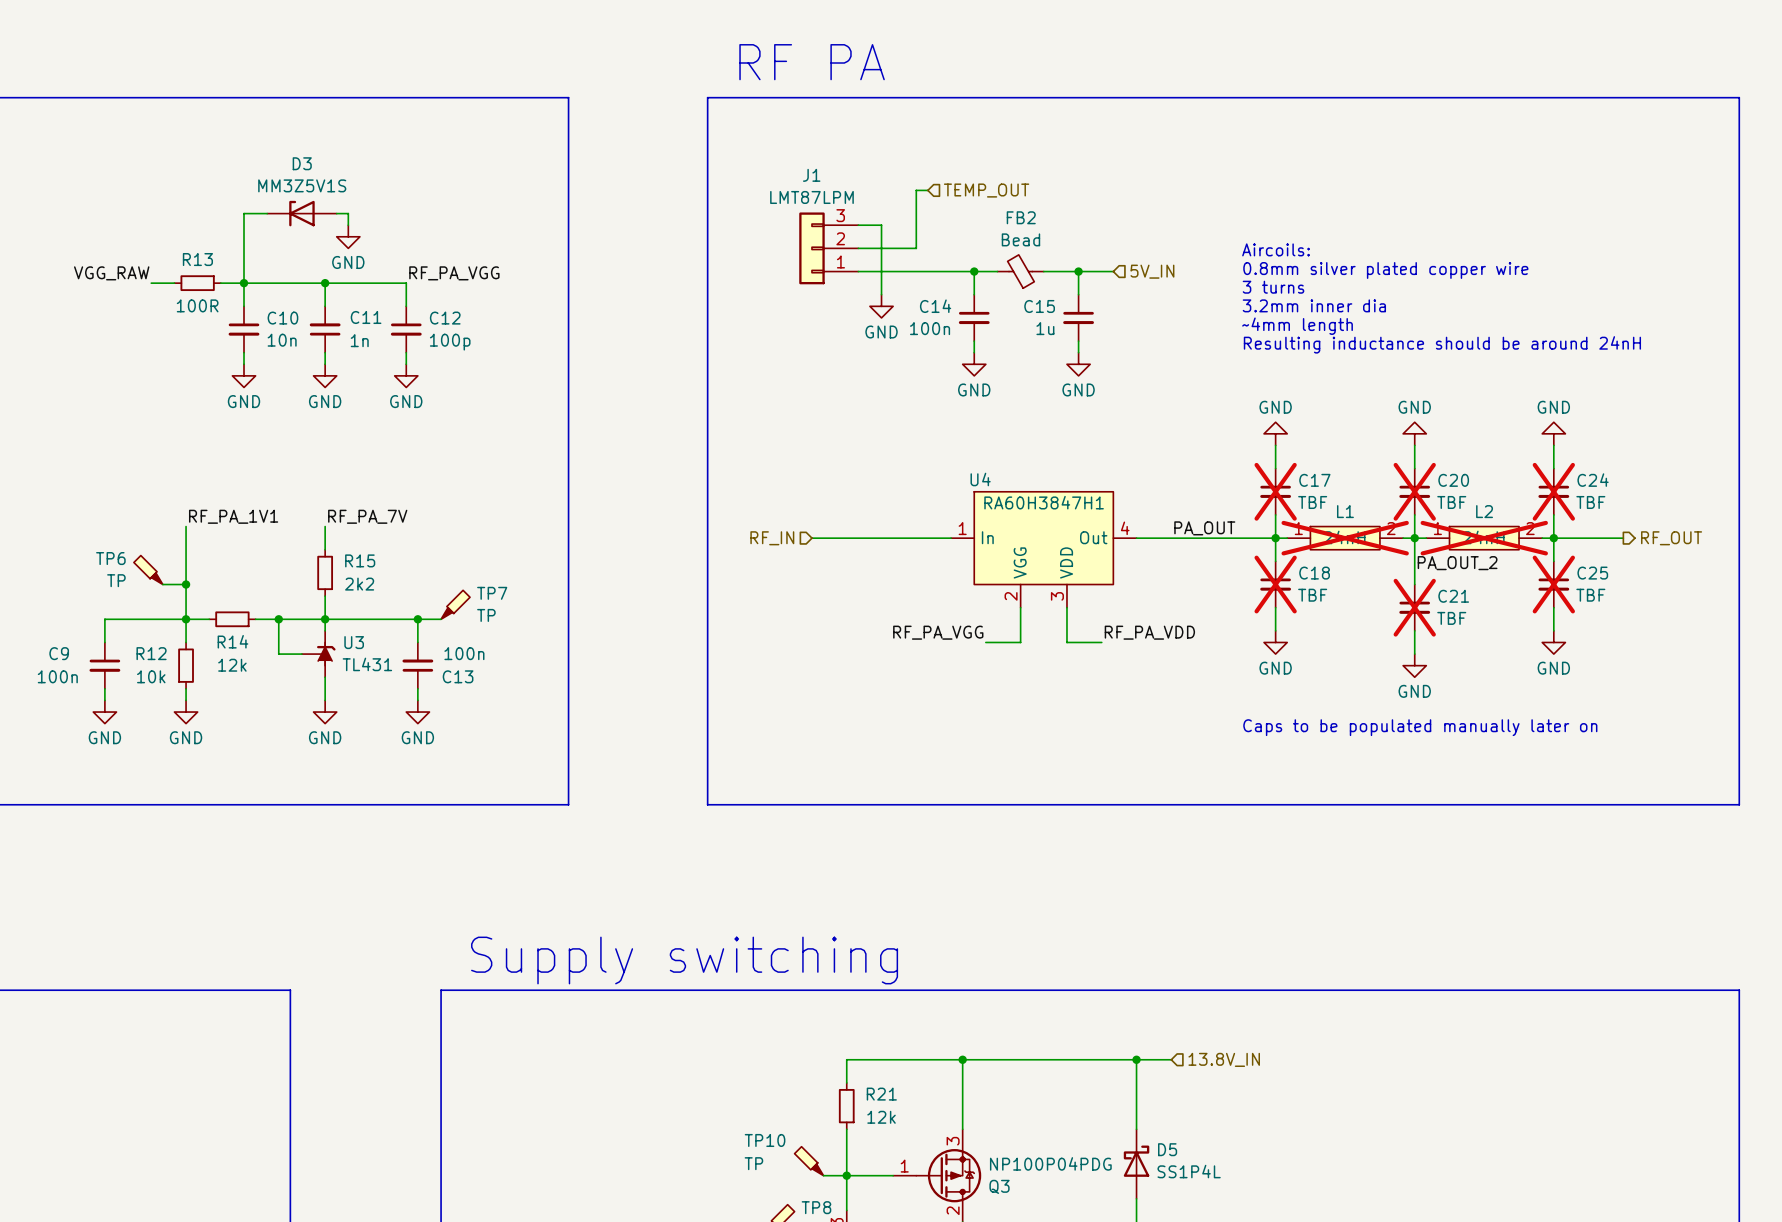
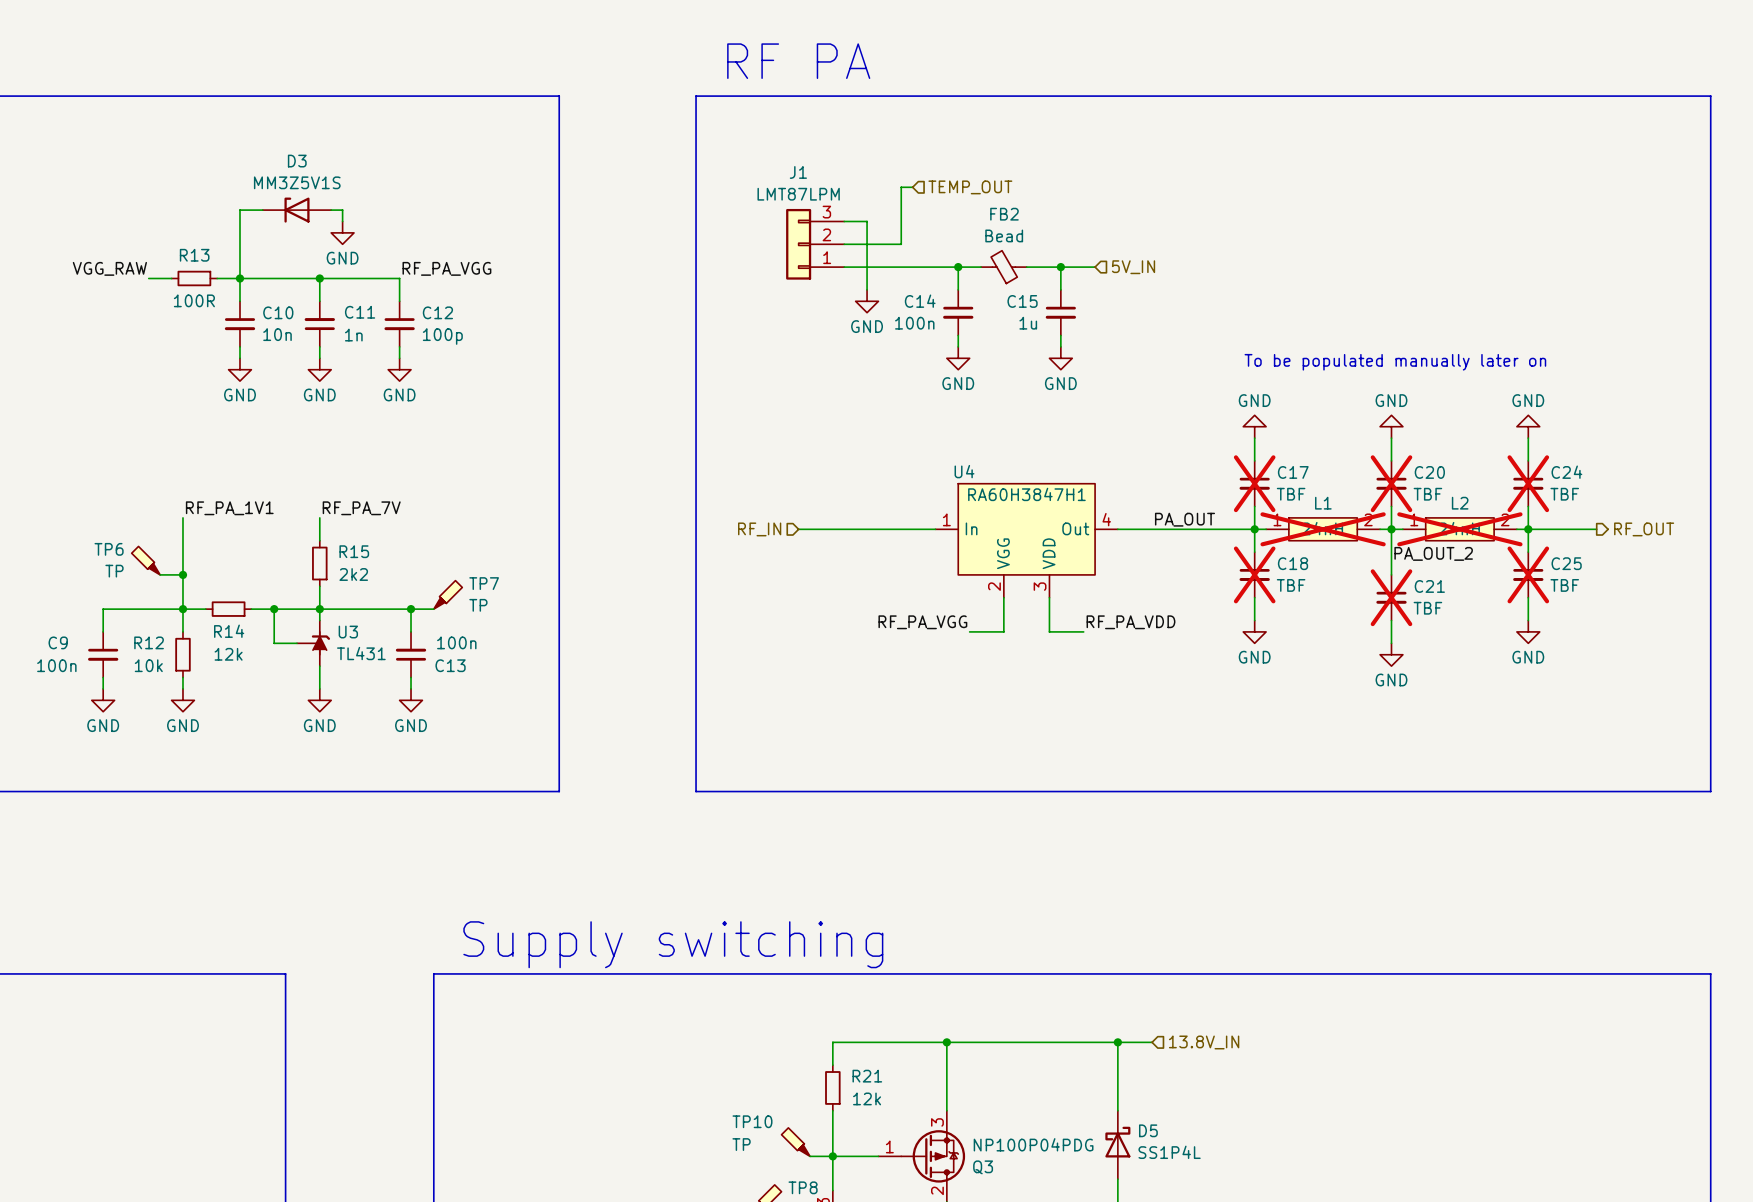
text: Aircoils: (1275, 249) -> none
text: 0.8mm silver plated copper wire (1385, 270) -> none
text: 3 turns (1273, 287) -> none
text: 3.2mm inner dia (1314, 305) -> none
text: ~4mm length (1297, 326) -> none
text: Resulting inductance should be around 24nH (1442, 344) -> none
text: none -> To be populated manually later on (1395, 362)
text: Caps to be populated manually later on (1420, 727) -> none

